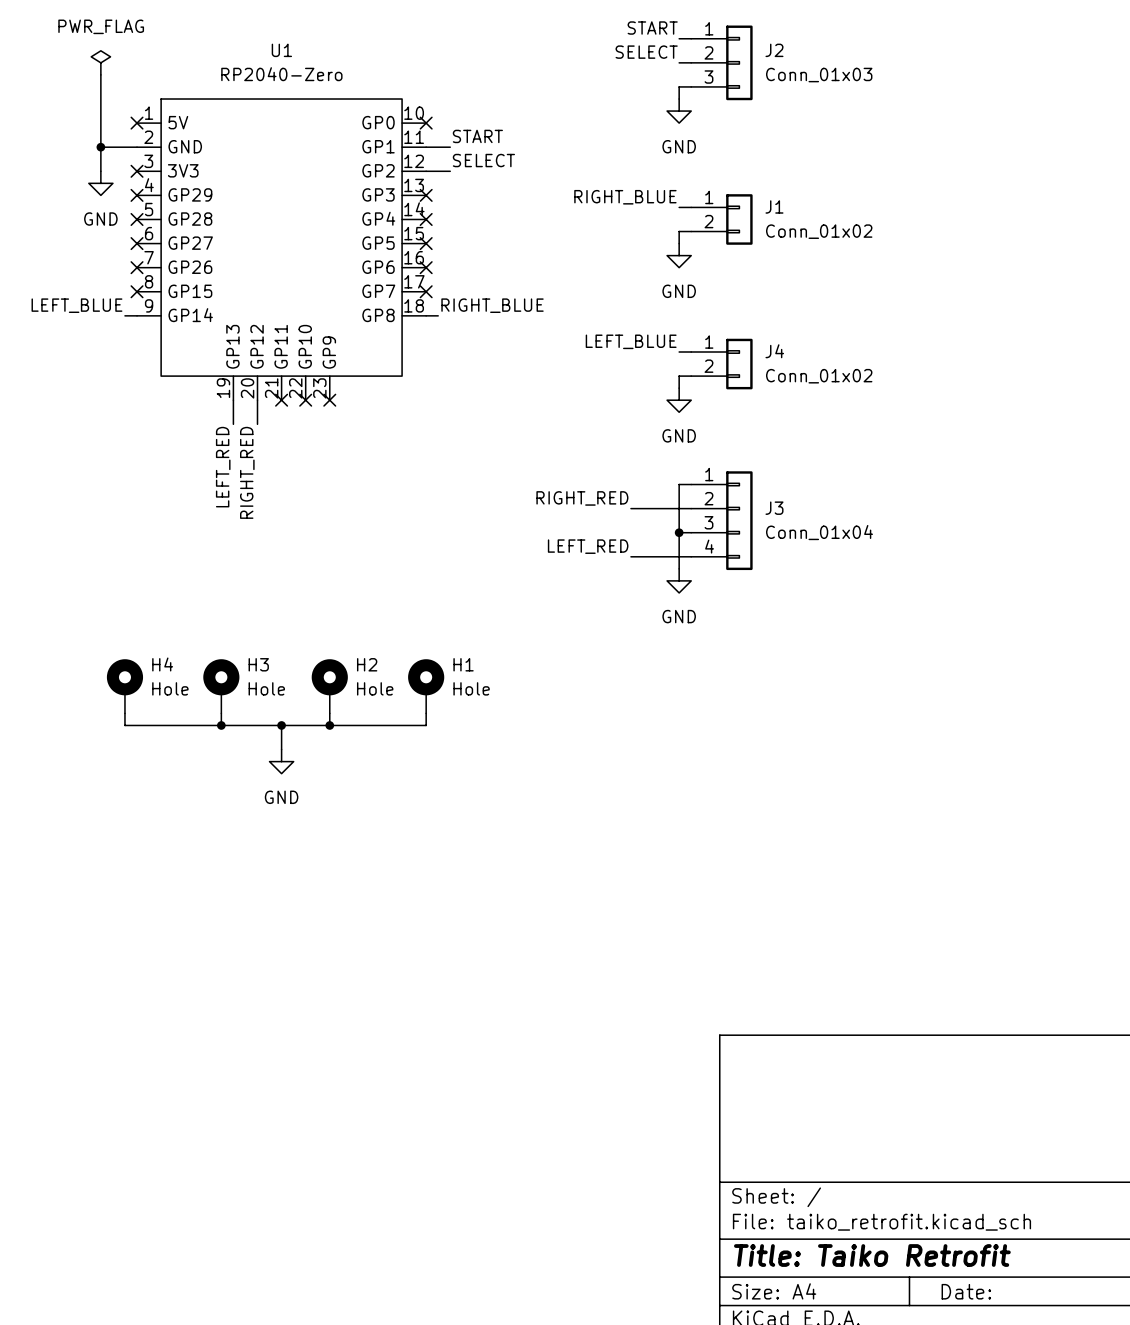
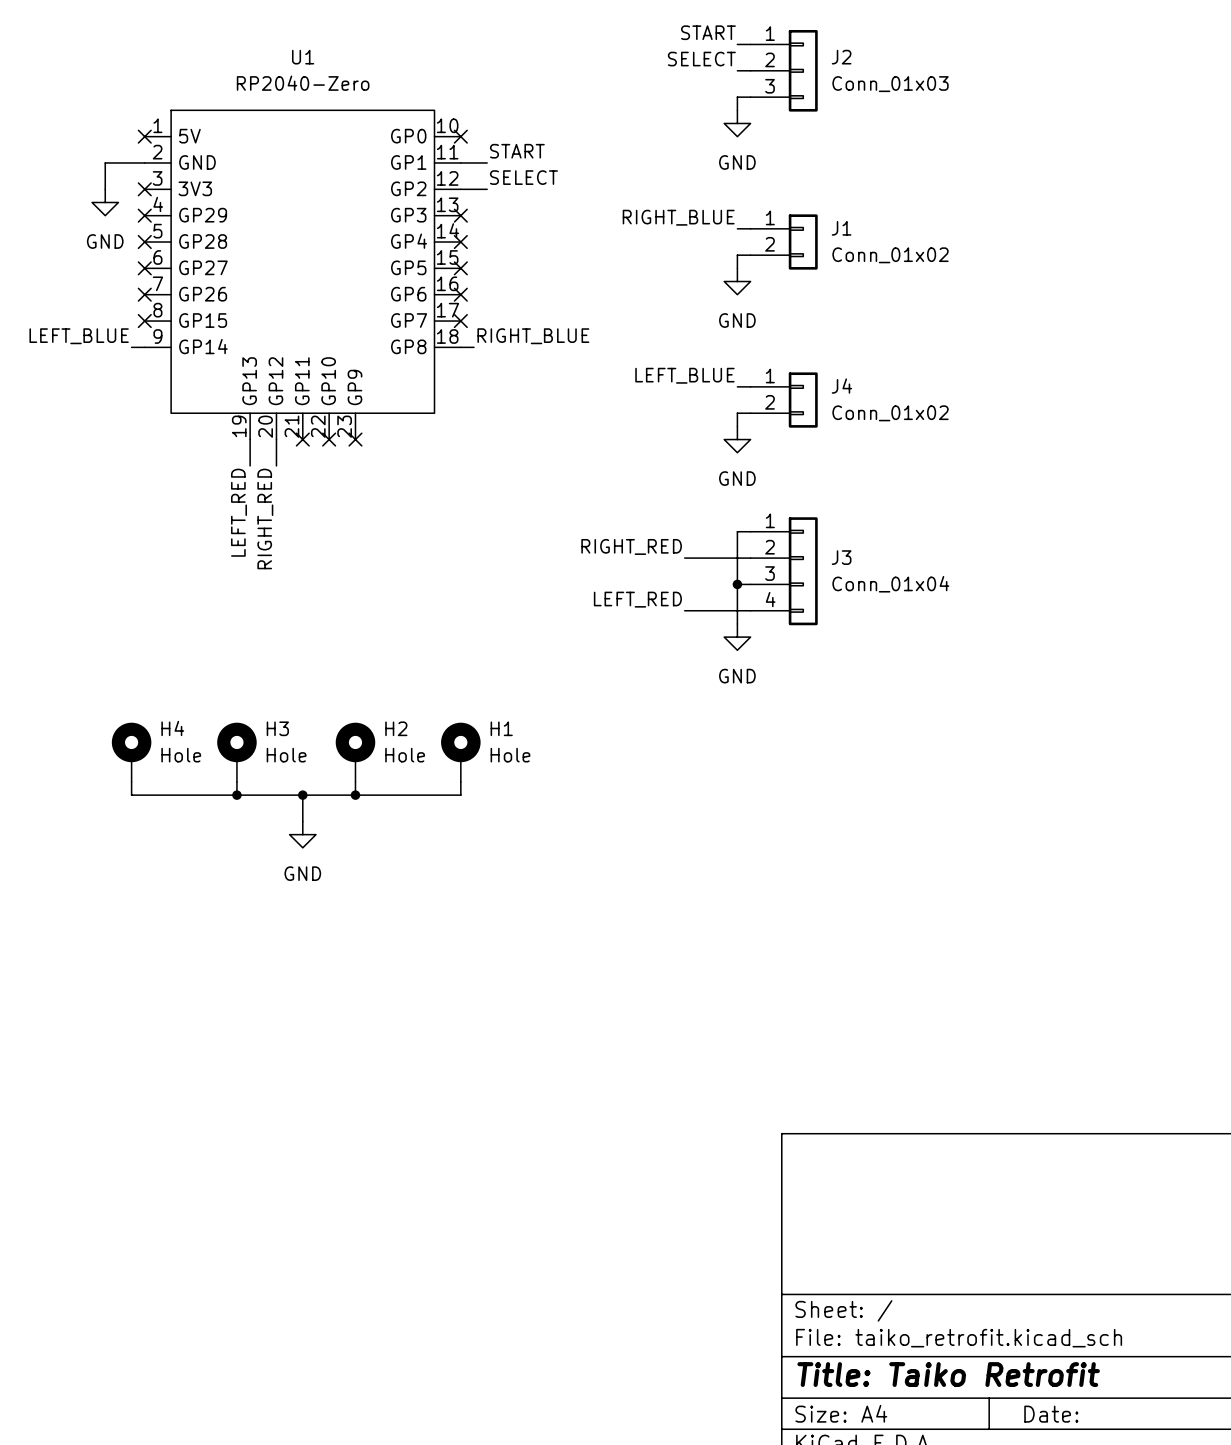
power symbol: PWR_FLAG (100, 62) -> none
wire: (100, 74) (100, 147) -> none
junction: (100, 147) -> none

